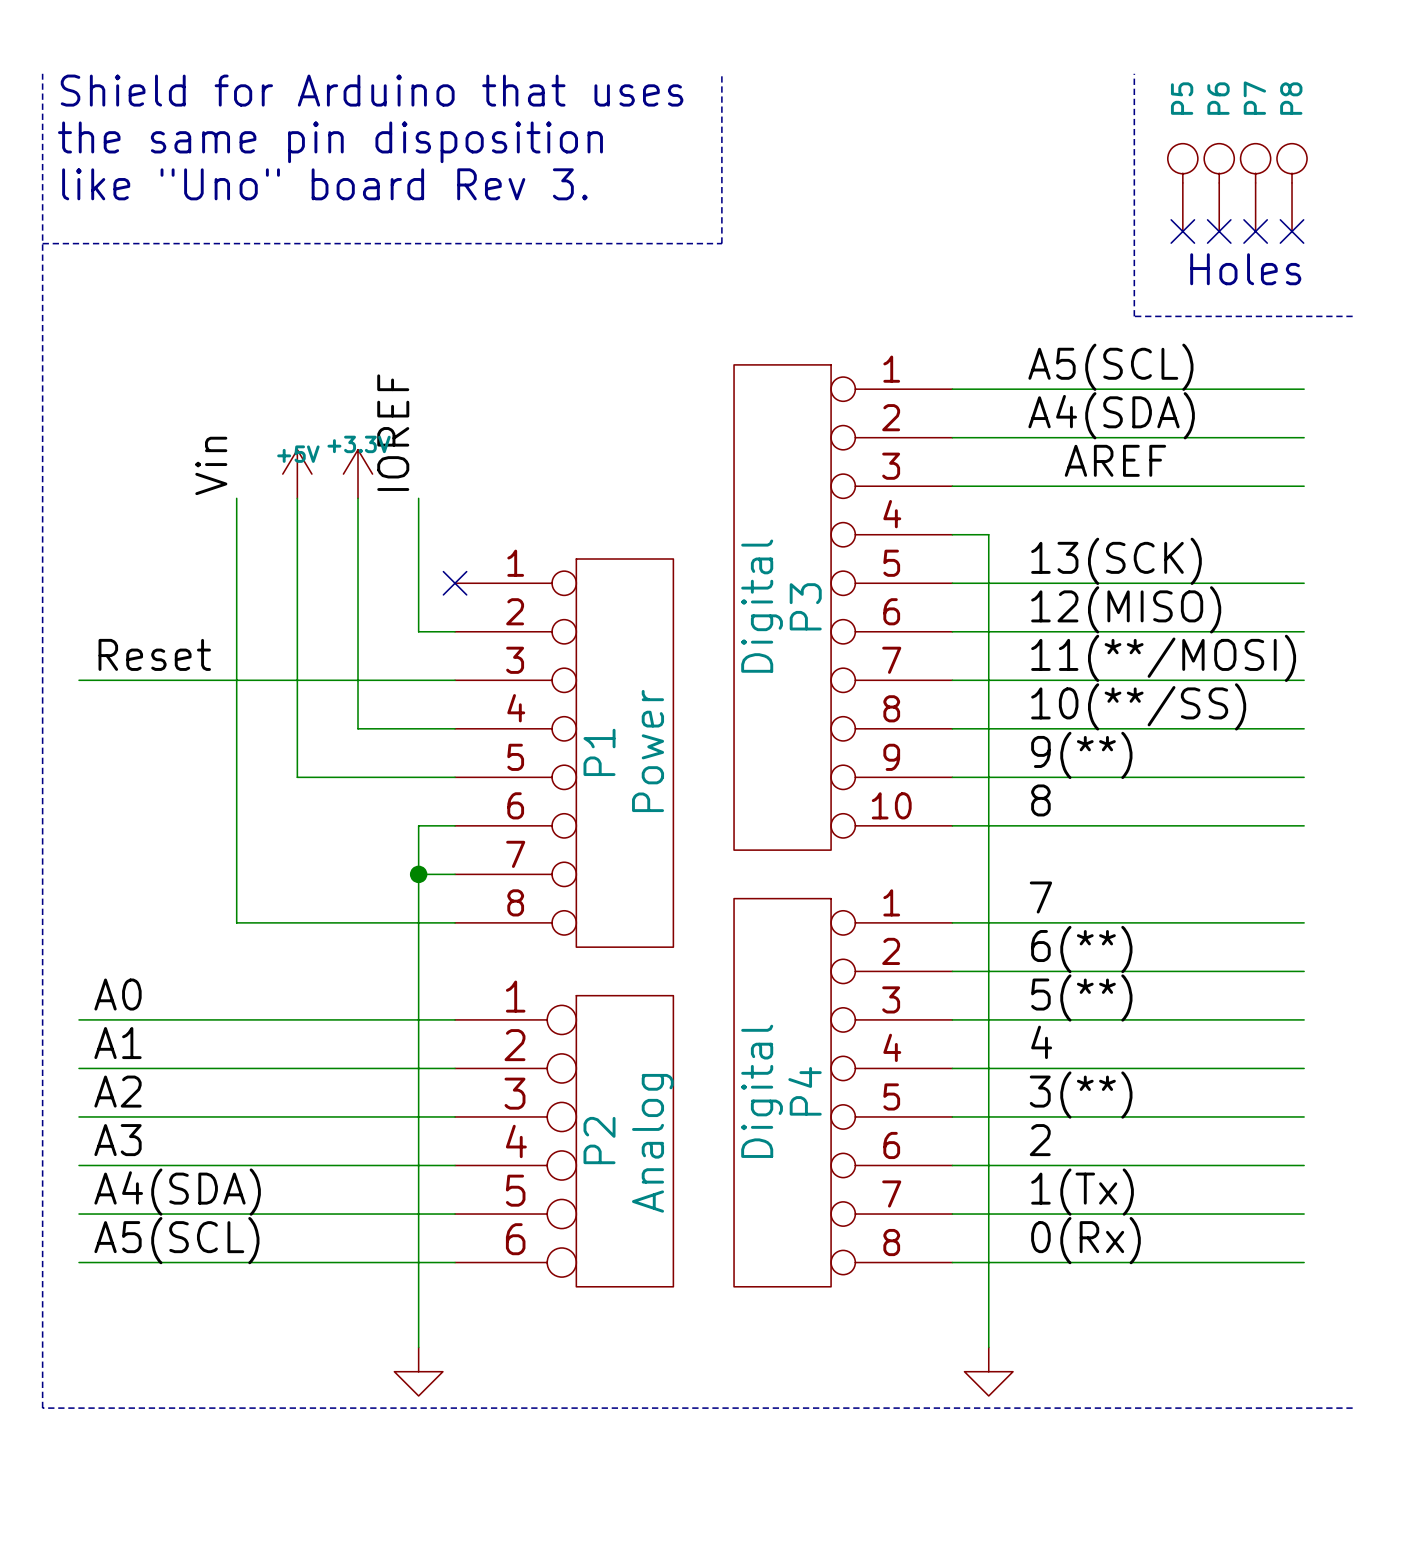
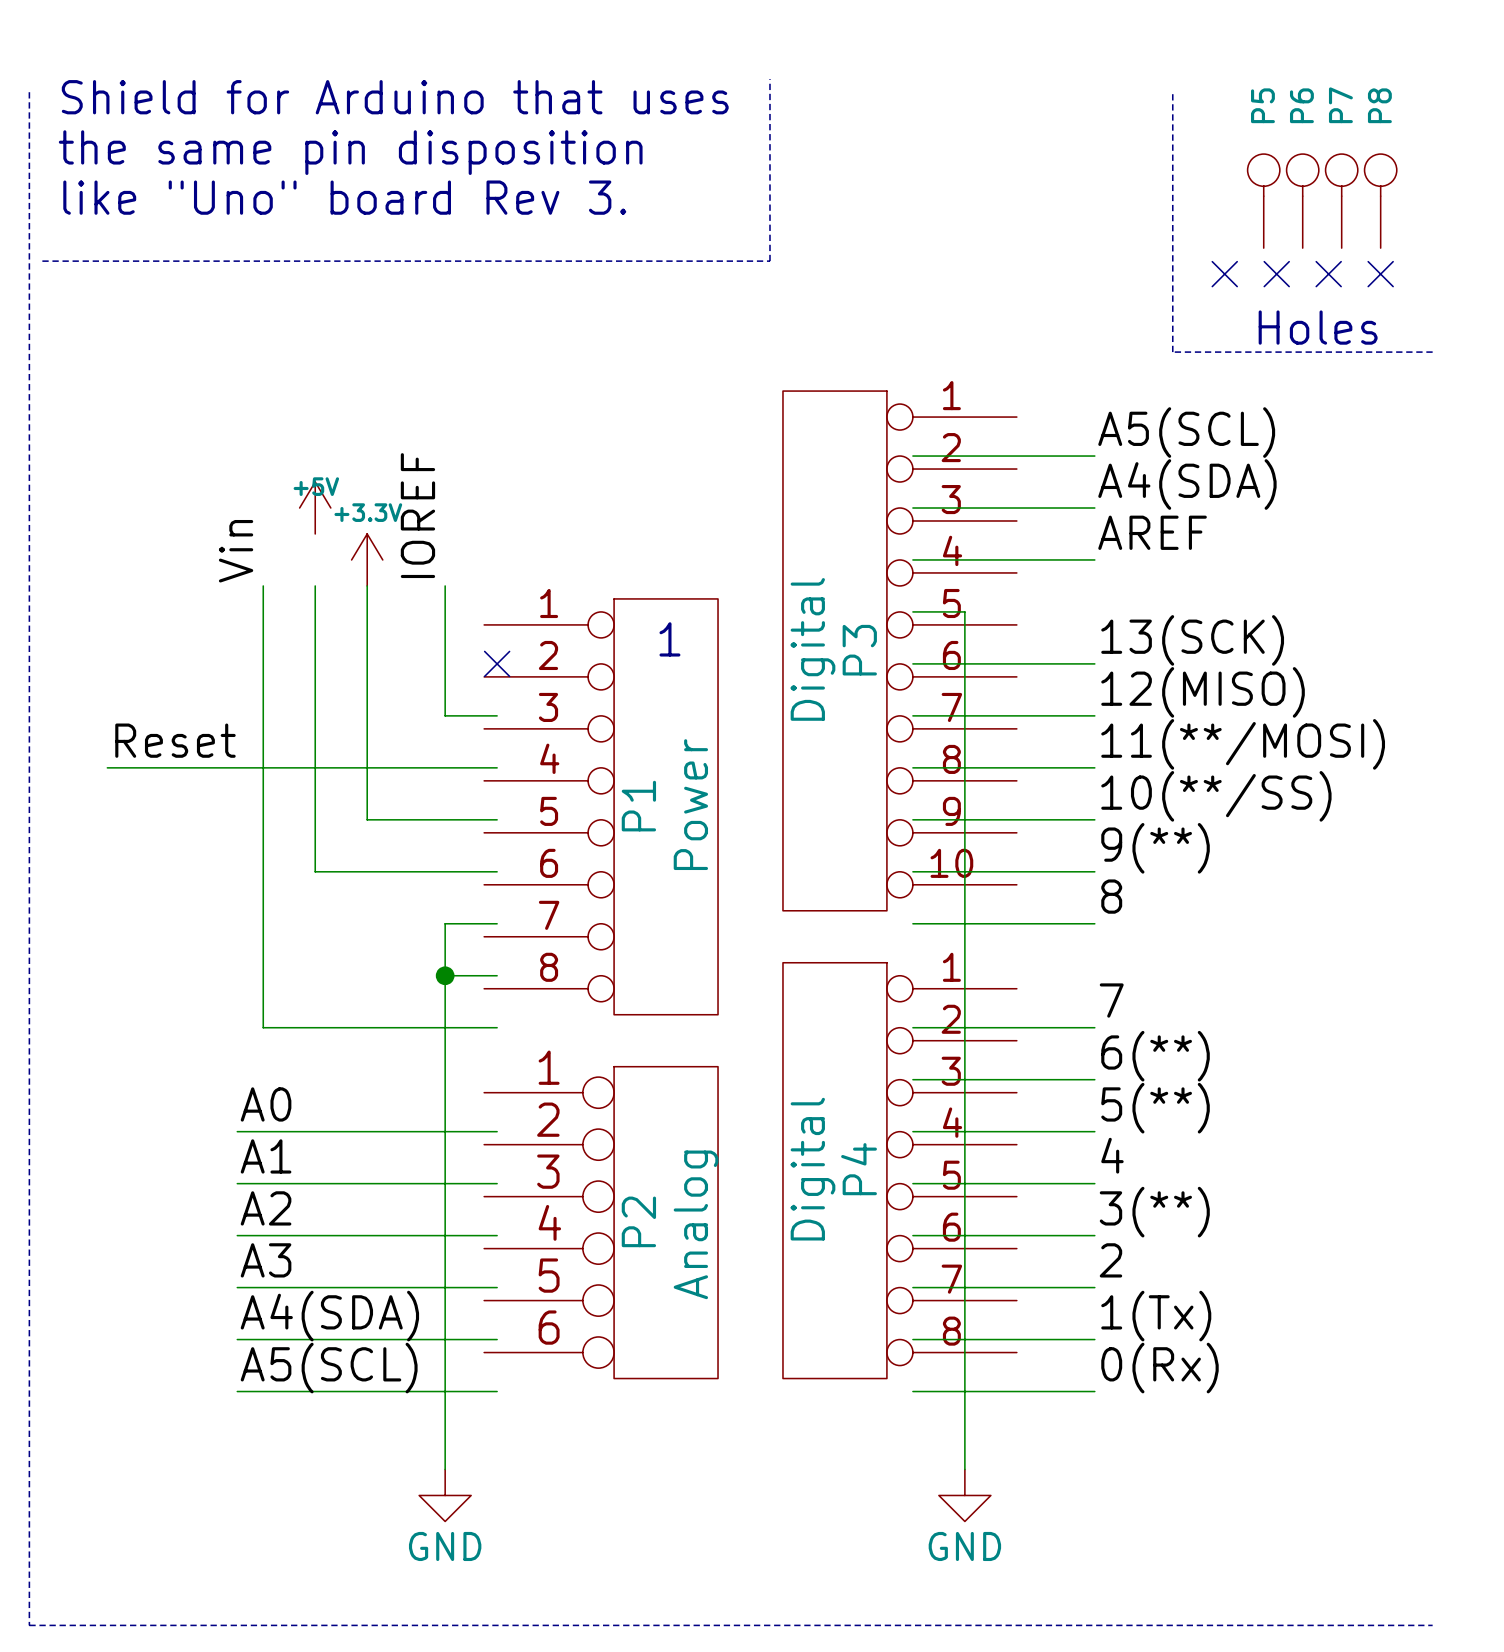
line: (42, 73) (42, 1408) (1352, 1408) -> none
line: (1134, 73) (1134, 316) (1352, 316) -> none
line: none -> (29, 92) (29, 1625) (1432, 1625)
line: none -> (1172, 92) (1172, 352) (1432, 352)
no-connect mark: (1182, 231) -> none
no-connect mark: (1219, 231) -> none
no-connect mark: (1255, 231) -> none
no-connect mark: (1292, 231) -> none
no-connect mark: none -> (1224, 274)
no-connect mark: none -> (1276, 274)
no-connect mark: none -> (1328, 274)
no-connect mark: none -> (1380, 274)
text position: Holes (1245, 269) -> Holes (1318, 327)
label position: A5(SCL) (1110, 367) -> A5(SCL) (1186, 432)
wire: (952, 389) (1304, 389) -> none
label position: A4(SDA) (1111, 415) -> A4(SDA) (1187, 484)
wire: none -> (912, 456) (1094, 456)
label position: IOREF (393, 432) -> IOREF (417, 515)
wire: (952, 437) (1304, 437) -> none
power symbol text position: +3.3V (359, 444) -> +3.3V (368, 512)
label position: AREF (1115, 460) -> AREF (1152, 532)
label position: Vin (211, 465) -> Vin (236, 551)
power symbol position: +3.3V (358, 474) -> +3.3V (367, 559)
wire: none -> (912, 508) (1094, 508)
wire: (952, 486) (1304, 486) -> none
wire: (236, 498) (236, 922) (455, 922) -> none
wire: (297, 498) (297, 546) -> none
wire: (358, 498) (358, 728) (455, 728) -> none
wire: (418, 498) (418, 546) -> none
wire: none -> (912, 559) (1094, 559)
wire: (952, 534) (988, 534) (988, 1347) -> none
wire: none -> (263, 585) (263, 1027) (497, 1027)
wire: none -> (367, 585) (367, 819) (497, 819)
label position: 13(SCK) (1116, 561) -> 13(SCK) (1192, 640)
wire: none -> (912, 611) (964, 611) (964, 1469)
no-connect mark position: (455, 583) -> (497, 663)
wire: (952, 583) (1304, 583) -> none
text: none -> 1 (669, 639)
label position: 12(MISO) (1126, 609) -> 12(MISO) (1203, 692)
wire: none -> (912, 663) (1094, 663)
wire: (418, 631) (455, 631) -> (445, 676) (445, 715) (497, 715)
wire: (952, 631) (1304, 631) -> none
label position: Reset (154, 654) -> Reset (175, 740)
label position: 11(**/MOSI) (1163, 658) -> 11(**/MOSI) (1243, 744)
wire: none -> (912, 715) (1094, 715)
wire: (79, 680) (455, 680) -> none
wire: (952, 680) (1304, 680) -> none
label position: 10(**/SS) (1138, 706) -> 10(**/SS) (1216, 796)
wire: none -> (107, 767) (497, 767)
wire: none -> (912, 767) (1094, 767)
wire: (952, 728) (1304, 728) -> none
label position: 9(**) (1081, 755) -> 9(**) (1155, 848)
wire: none -> (912, 819) (1094, 819)
wire: (297, 777) (455, 777) -> (315, 832) (315, 871) (497, 871)
wire: (952, 777) (1304, 777) -> none
label position: 8 (1040, 800) -> 8 (1111, 896)
wire: none -> (912, 871) (1094, 871)
wire: (455, 825) (418, 825) (418, 862) -> (497, 923) (445, 923)
wire: (952, 825) (1304, 825) -> none
wire: none -> (912, 923) (1094, 923)
wire: (418, 874) (455, 874) -> none
junction position: (418, 874) -> (445, 975)
label position: 7 (1040, 897) -> 7 (1111, 1000)
wire: none -> (445, 975) (497, 975)
wire: (952, 922) (1304, 922) -> none
label position: 6(**) (1081, 949) -> 6(**) (1155, 1056)
wire: none -> (912, 1027) (1094, 1027)
wire: (952, 971) (1304, 971) -> none
label position: A0 (118, 994) -> A0 (266, 1104)
label position: 5(**) (1081, 998) -> 5(**) (1155, 1108)
wire: none -> (912, 1079) (1094, 1079)
wire: (79, 1019) (455, 1019) -> none
wire: (952, 1019) (1304, 1019) -> none
label position: 4 (1041, 1042) -> 4 (1112, 1155)
label position: A1 (118, 1043) -> A1 (266, 1156)
wire: none -> (237, 1131) (497, 1131)
wire: none -> (912, 1131) (1094, 1131)
wire: (79, 1068) (455, 1068) -> none
wire: (952, 1068) (1304, 1068) -> none
label position: A2 (118, 1091) -> A2 (266, 1208)
label position: 3(**) (1081, 1095) -> 3(**) (1154, 1212)
wire: none -> (237, 1183) (497, 1183)
wire: none -> (912, 1183) (1094, 1183)
wire: (79, 1116) (455, 1116) -> none
wire: (952, 1116) (1304, 1116) -> none
label position: A3 (118, 1140) -> A3 (266, 1260)
label position: 2 (1040, 1140) -> 2 (1110, 1260)
wire: none -> (237, 1235) (497, 1235)
wire: none -> (912, 1235) (1094, 1235)
wire: (79, 1165) (455, 1165) -> none
wire: (952, 1165) (1304, 1165) -> none
label position: A4(SDA) (177, 1192) -> A4(SDA) (329, 1316)
label position: 1(Tx) (1082, 1192) -> 1(Tx) (1156, 1316)
wire: none -> (237, 1287) (497, 1287)
wire: none -> (912, 1287) (1094, 1287)
wire: (79, 1214) (455, 1214) -> none
wire: (952, 1214) (1304, 1214) -> none
label position: A5(SCL) (176, 1240) -> A5(SCL) (329, 1368)
label position: 0(Rx) (1085, 1240) -> 0(Rx) (1159, 1368)
wire: none -> (237, 1339) (497, 1339)
wire: none -> (912, 1339) (1094, 1339)
wire: (79, 1262) (455, 1262) -> none
wire: (952, 1262) (1304, 1262) -> none
wire: none -> (237, 1391) (497, 1391)
wire: none -> (912, 1391) (1094, 1391)
power symbol: (418, 1371) -> none
power symbol: (988, 1371) -> none
power symbol: none -> GND (445, 1495)
power symbol: none -> GND (964, 1495)

